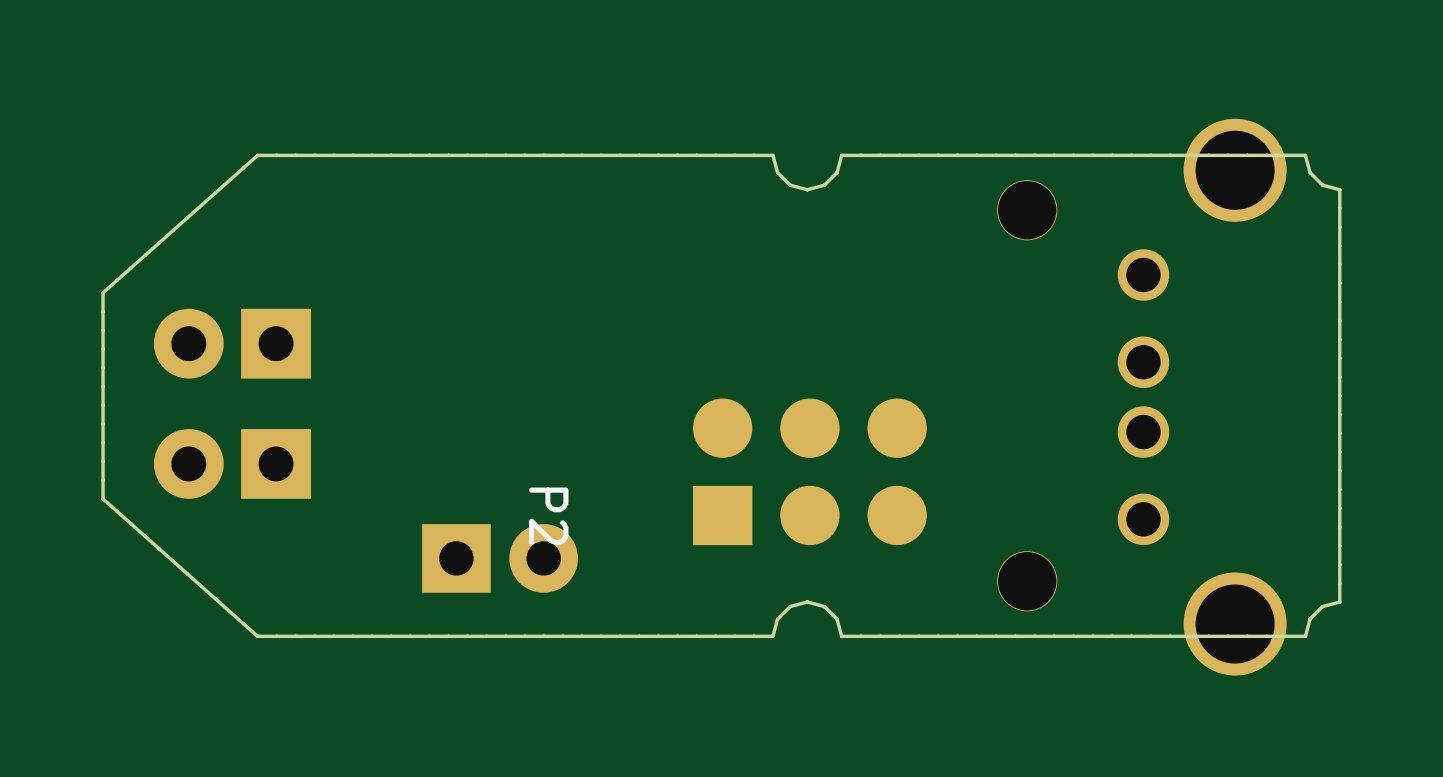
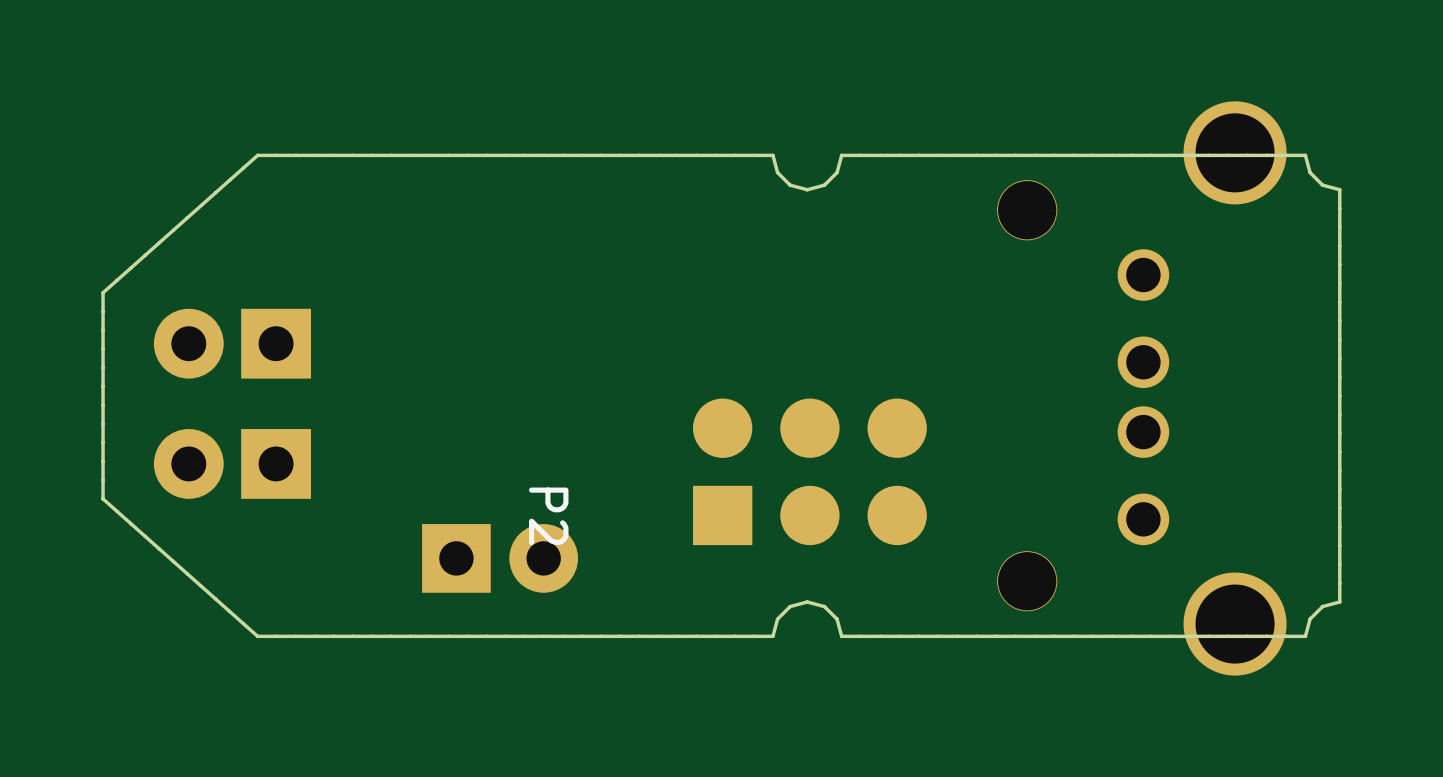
part footprint: [1117, 118, 1287, 676] -> [1117, 101, 1287, 676]

